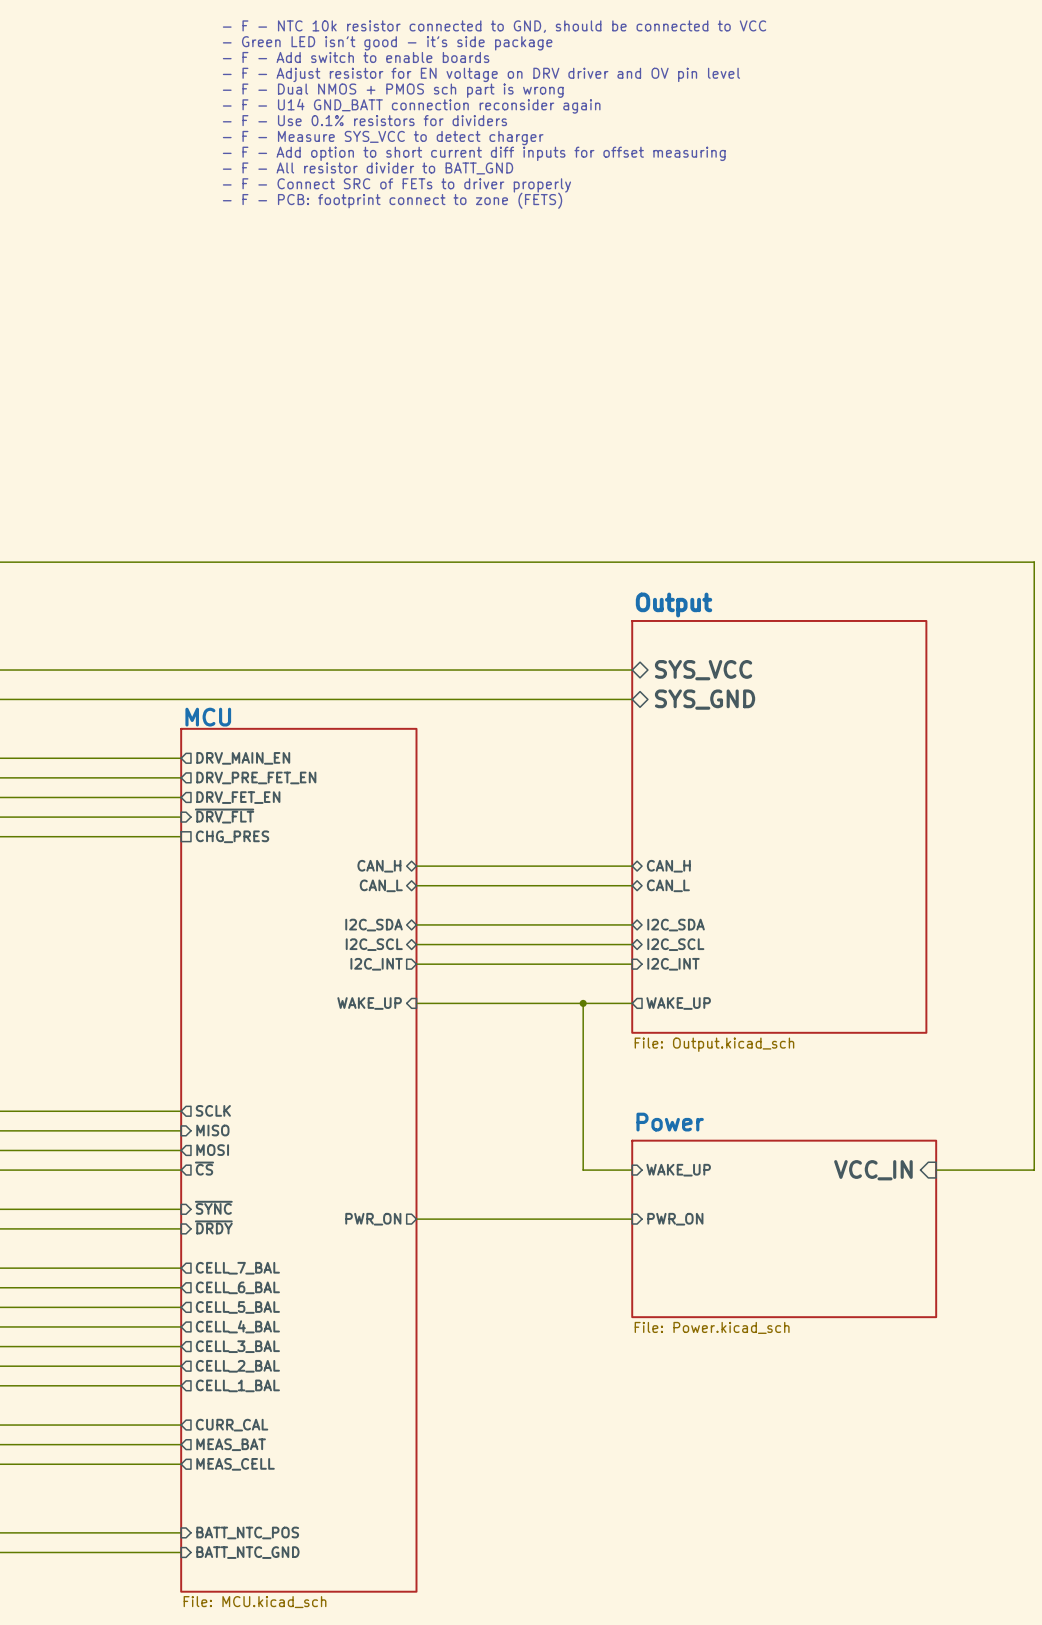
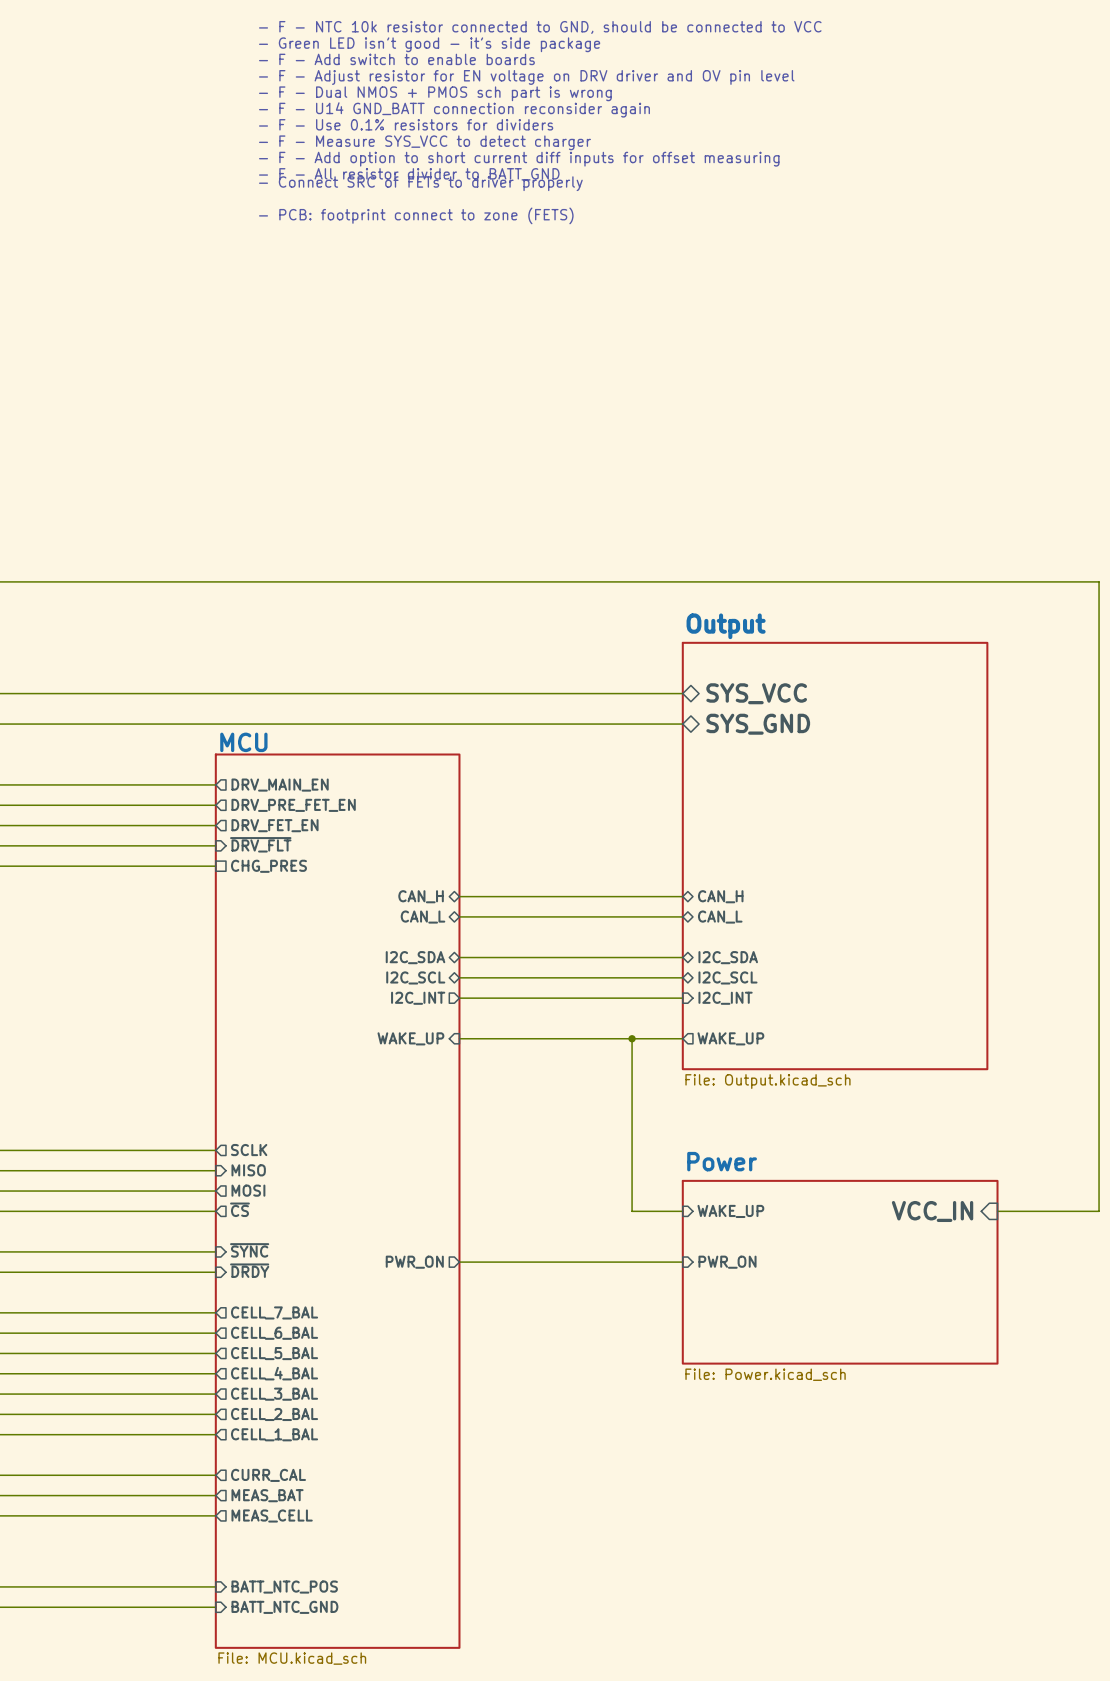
text: - F - Connect SRC of FETs to driver properly (396, 185) -> - Connect SRC of FETs to driver properly (420, 183)
text: - F - PCB: footprint connect to zone (FETS) (392, 200) -> - PCB: footprint connect to zone (FETS) (416, 215)

